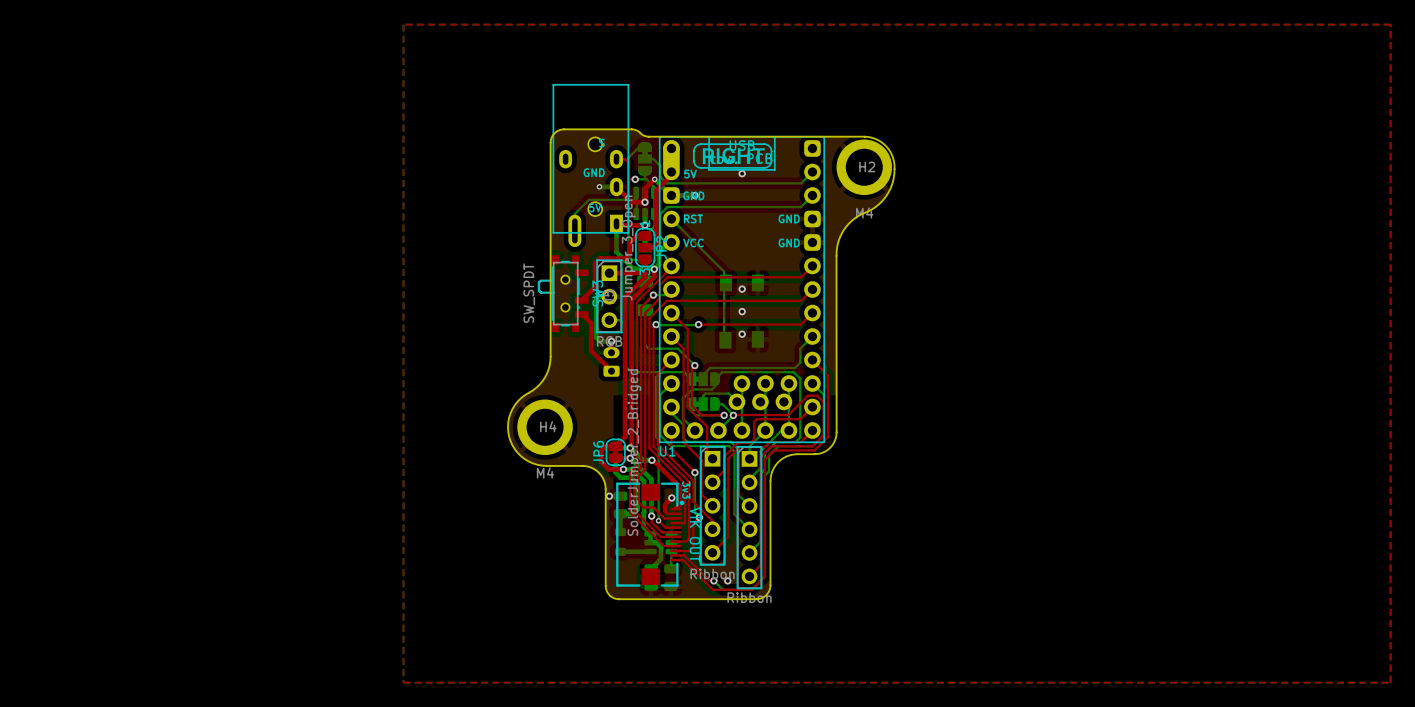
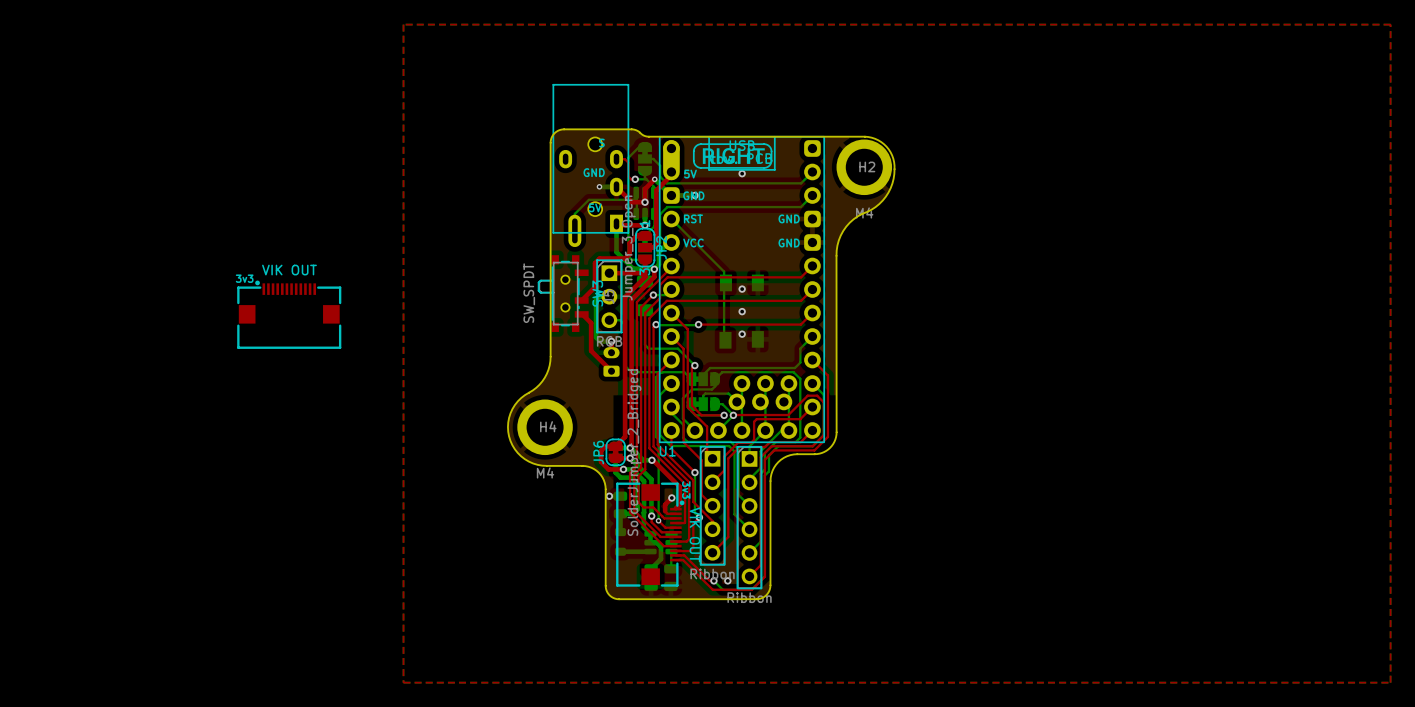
part: none -> (289, 314)

